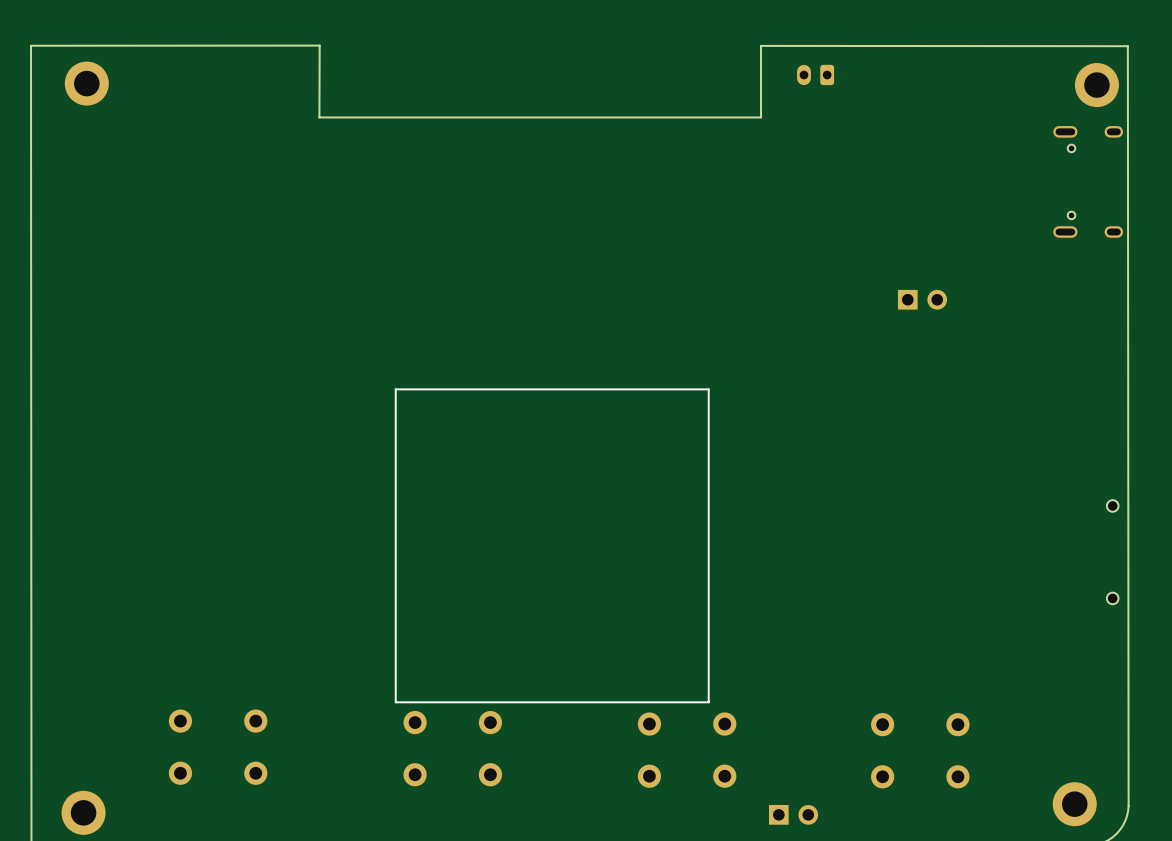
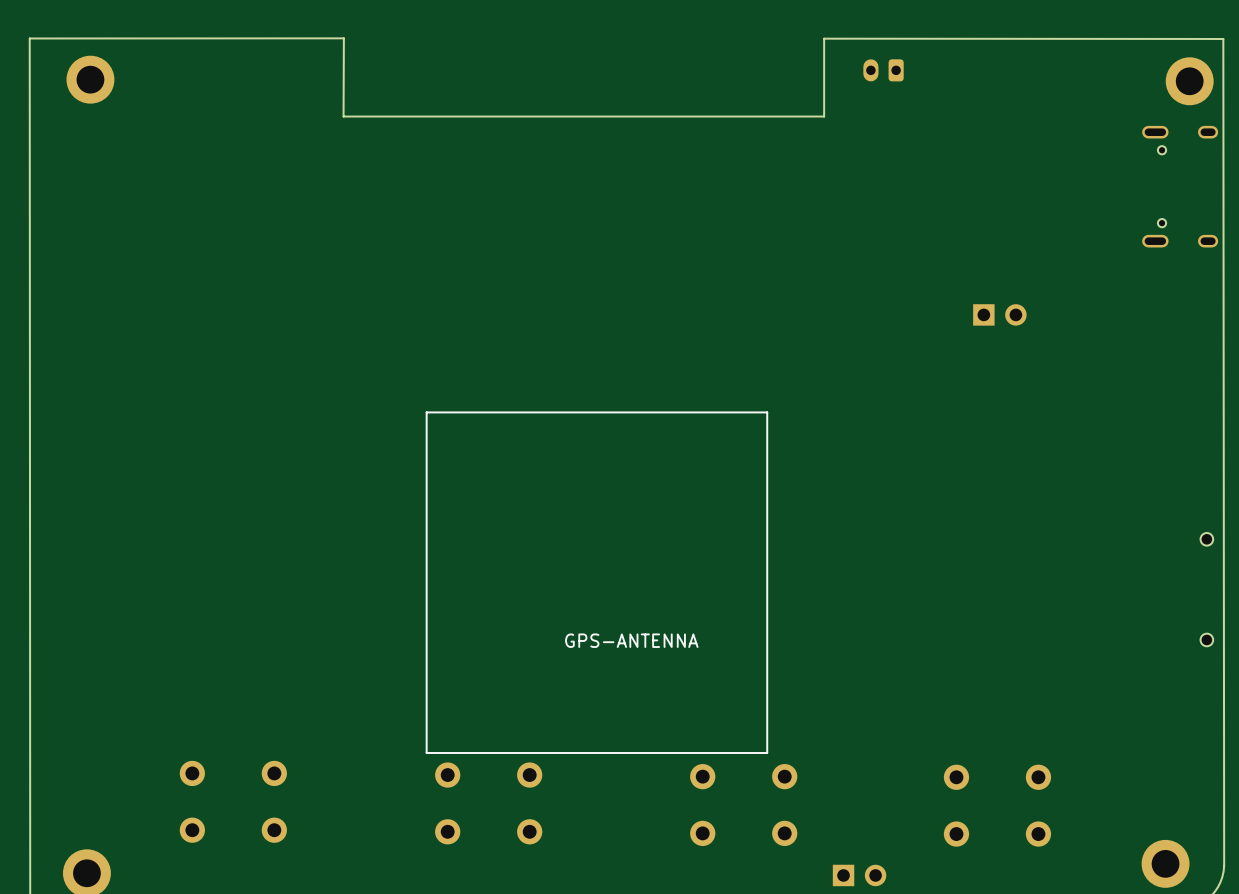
text: none -> GPS-ANTENNA (631, 640)

